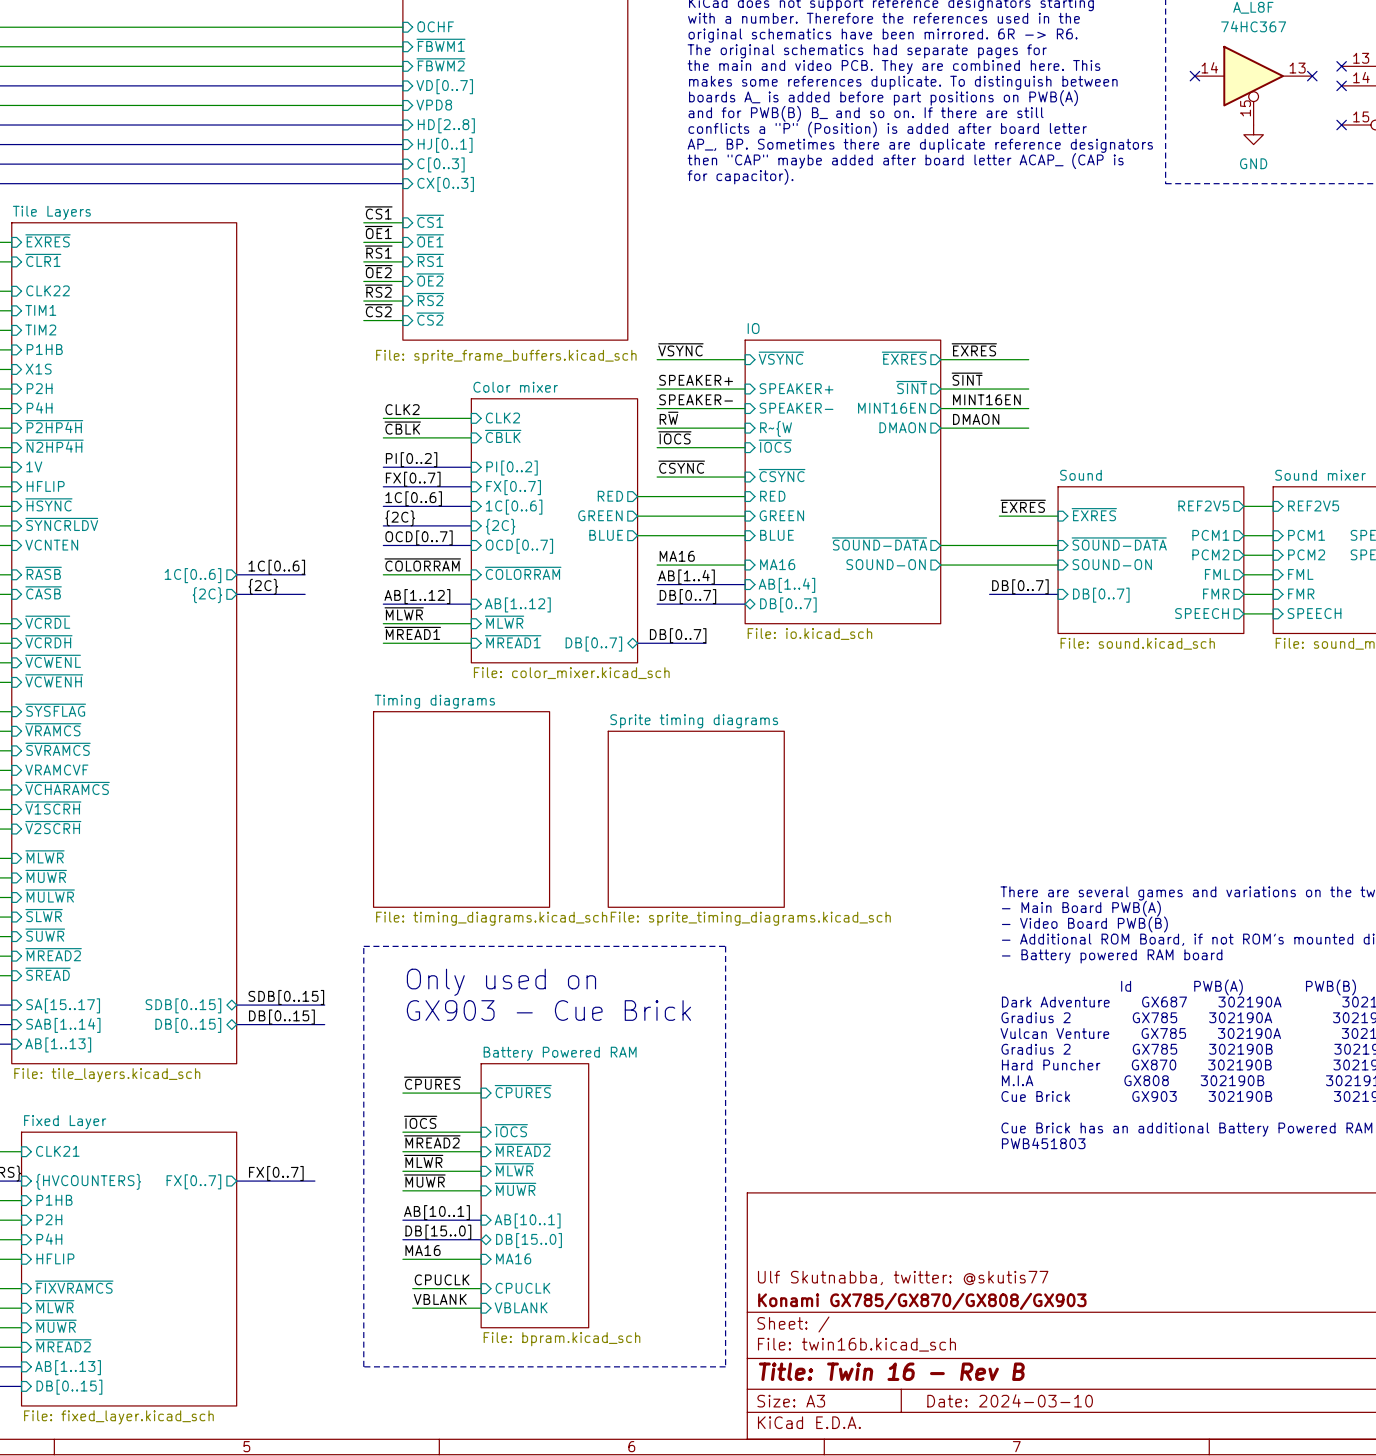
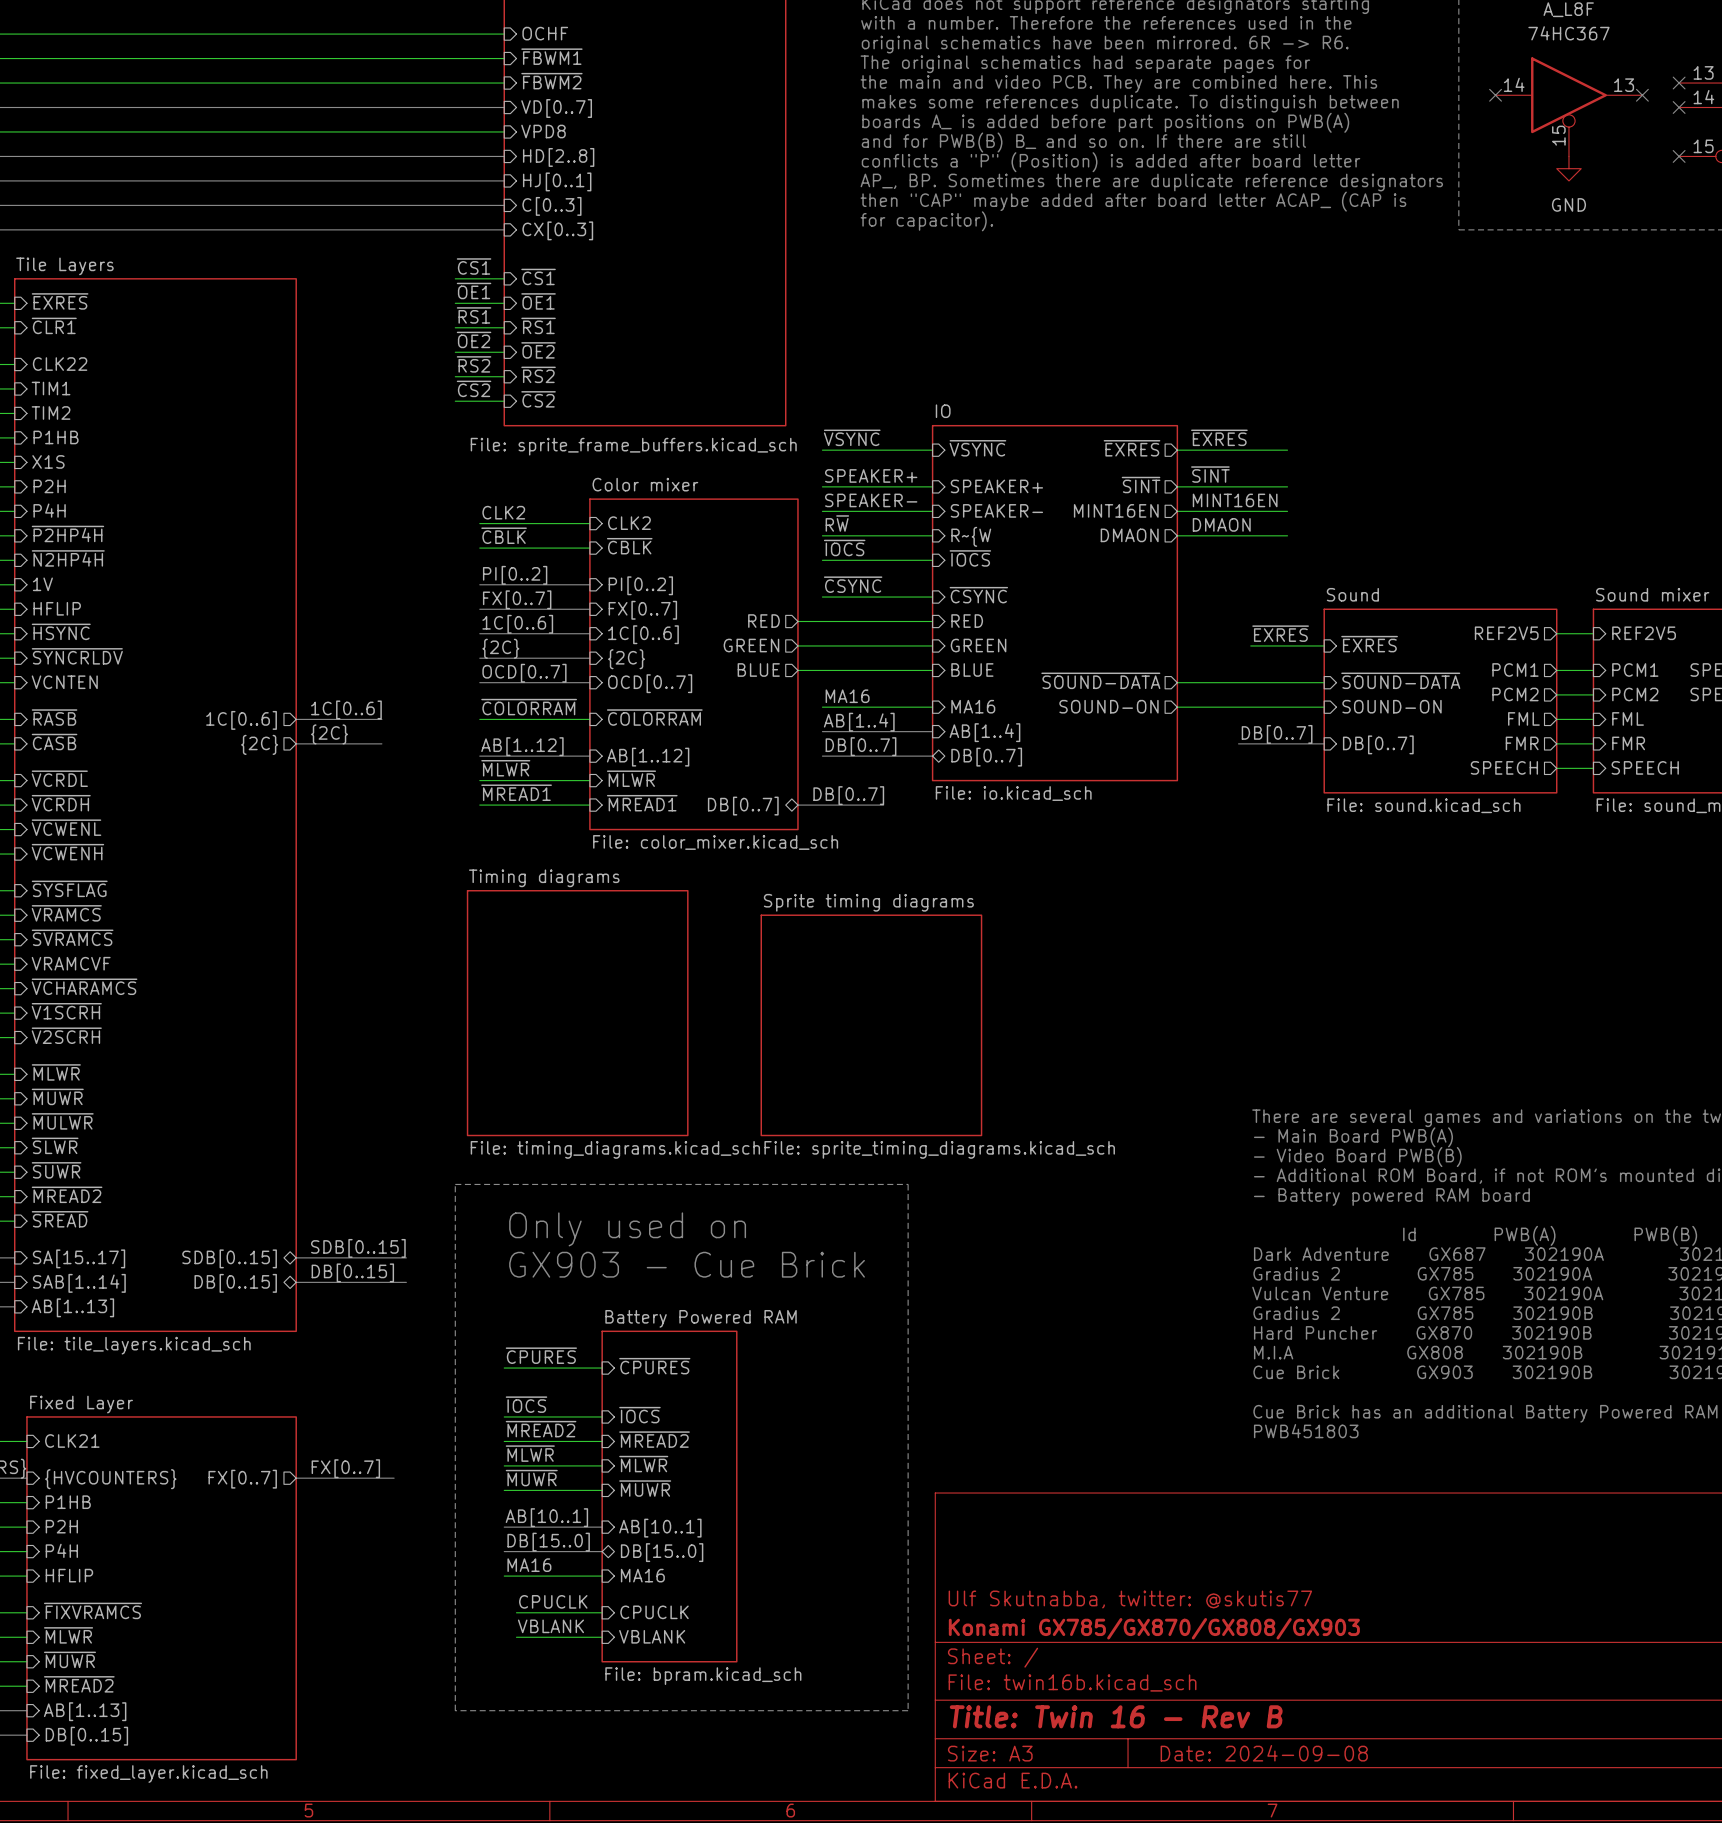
title block: Date: 2024-03-10 (1010, 1400) -> Date: 2024-09-08 (1264, 1753)

